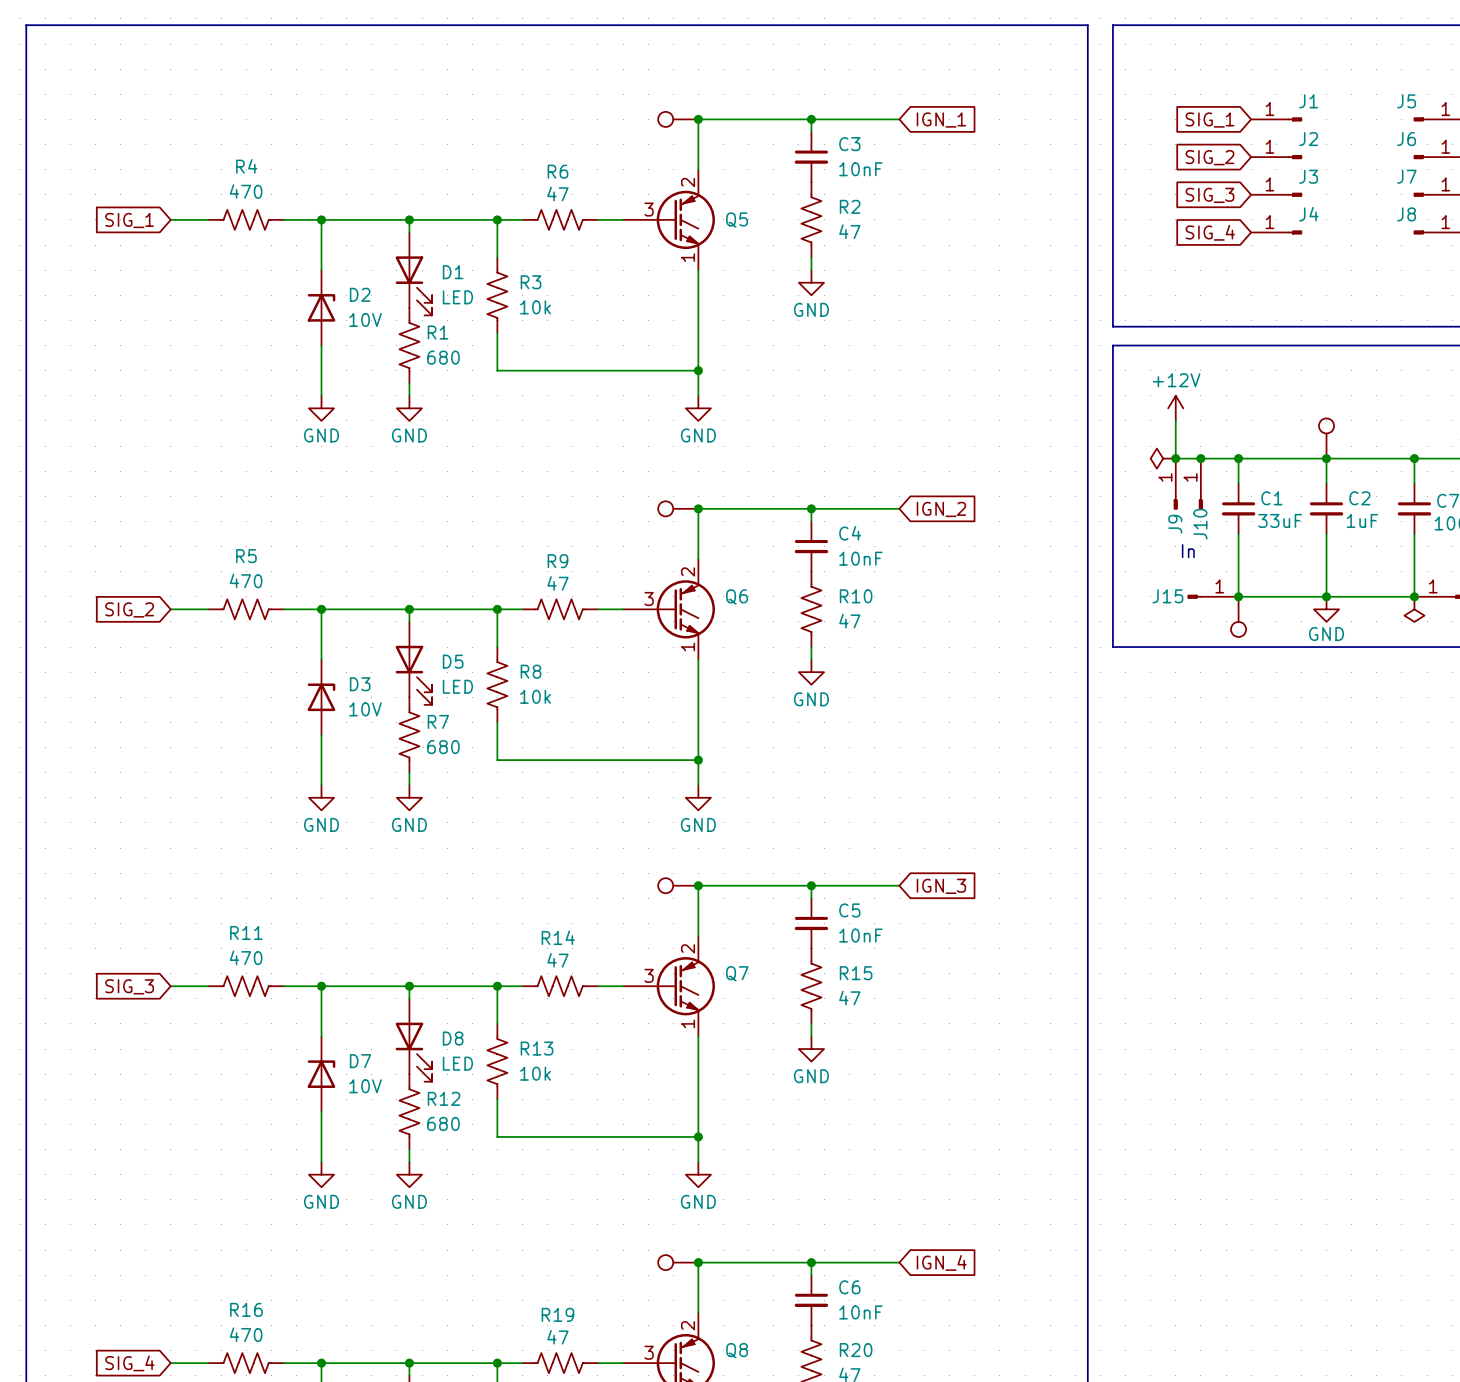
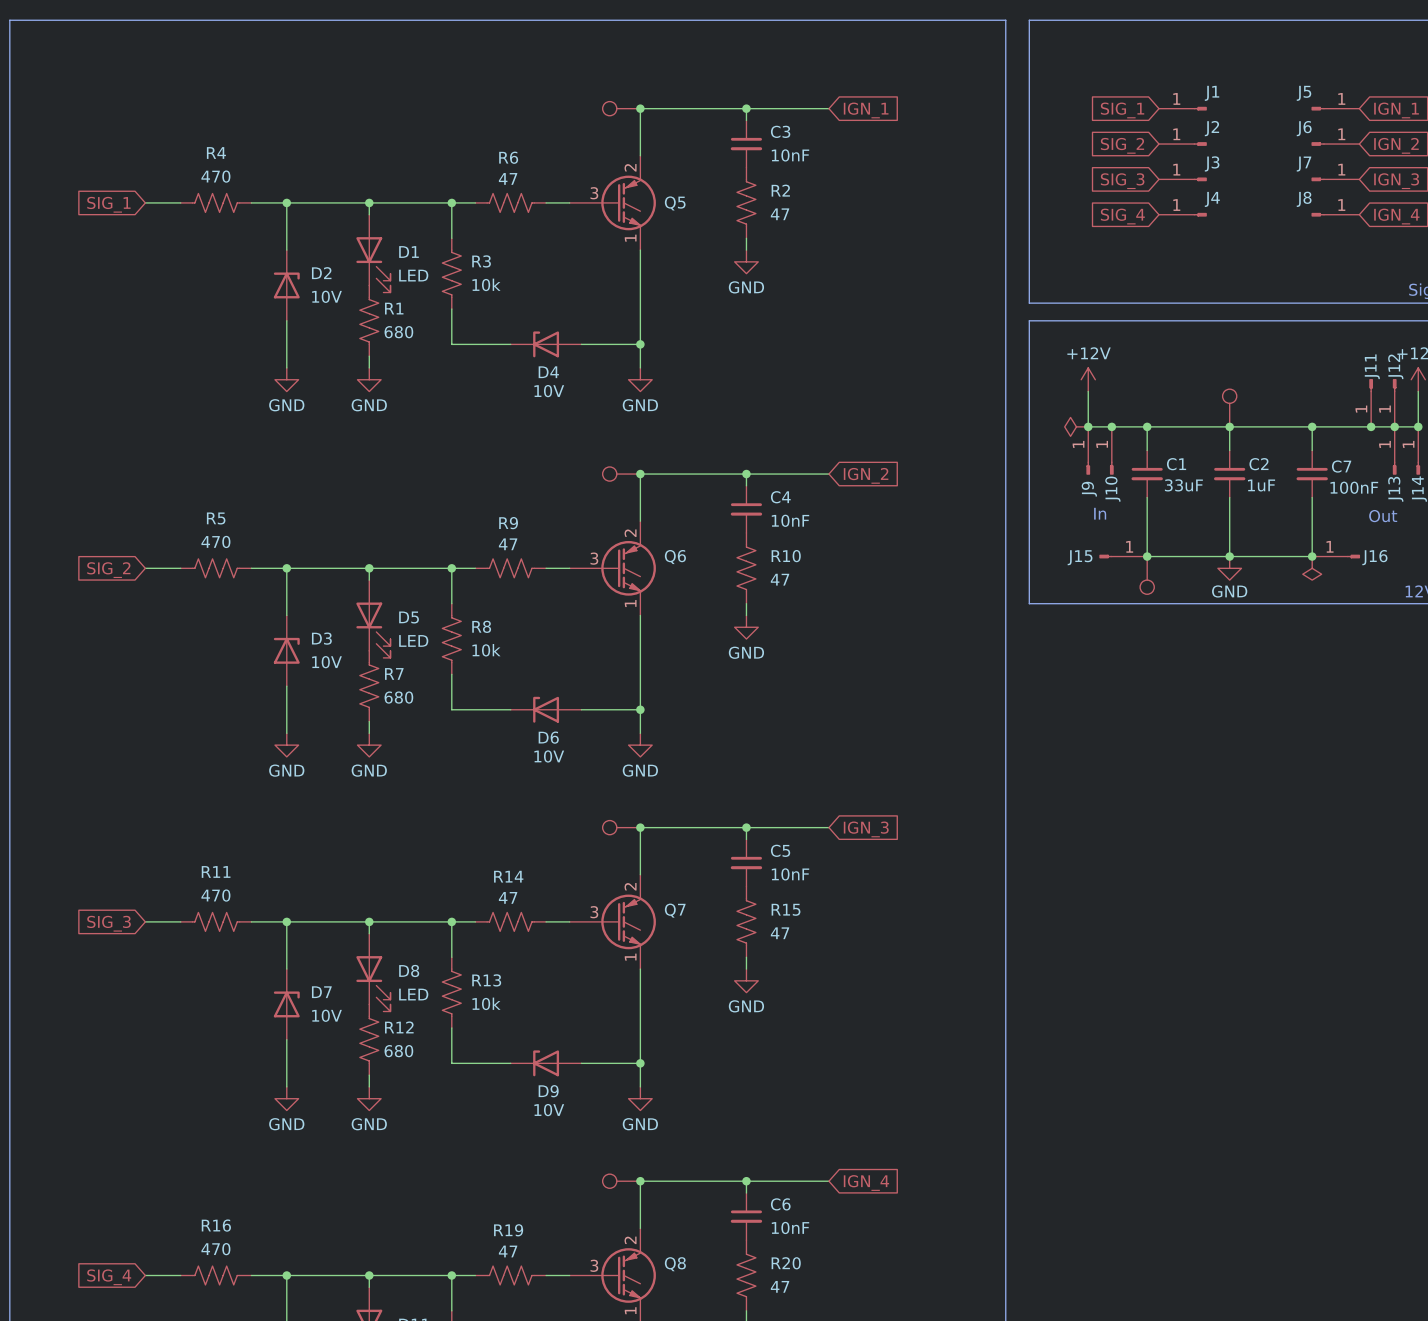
D4: none -> 10V (546, 344)
D6: none -> 10V (546, 709)
D9: none -> 10V (546, 1063)

